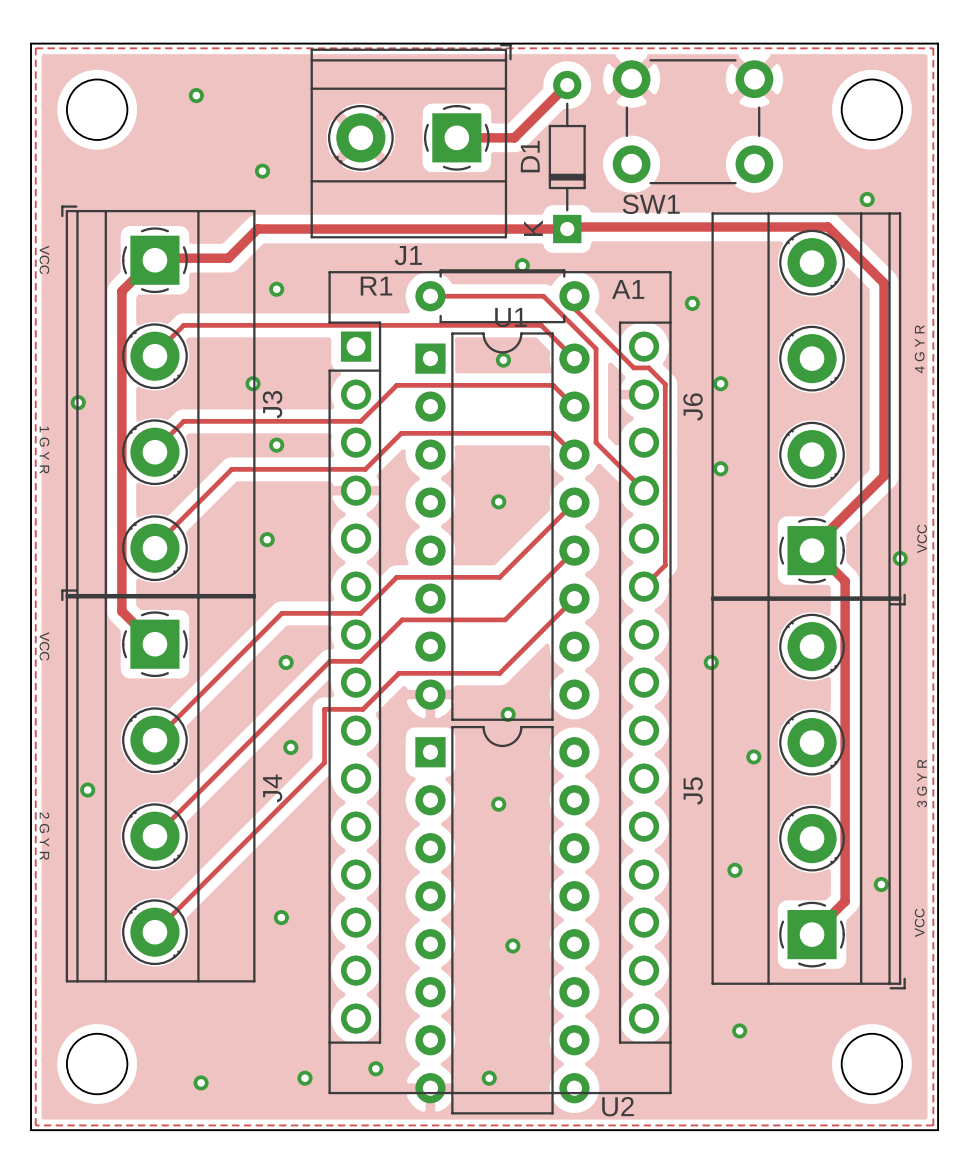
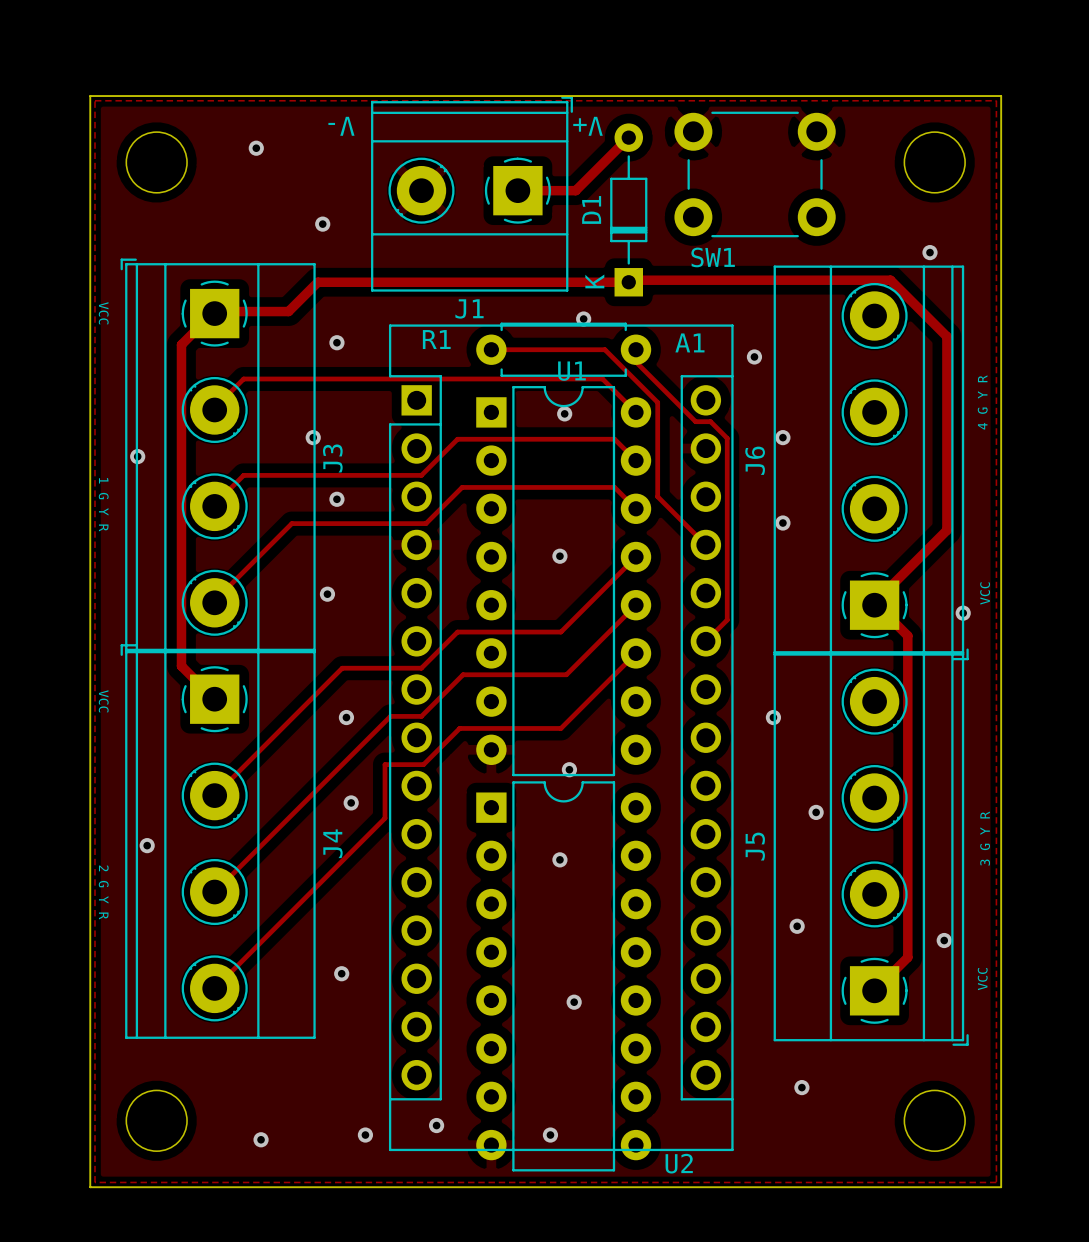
text: none -> V- (341, 126)
text: none -> V+ (587, 126)

